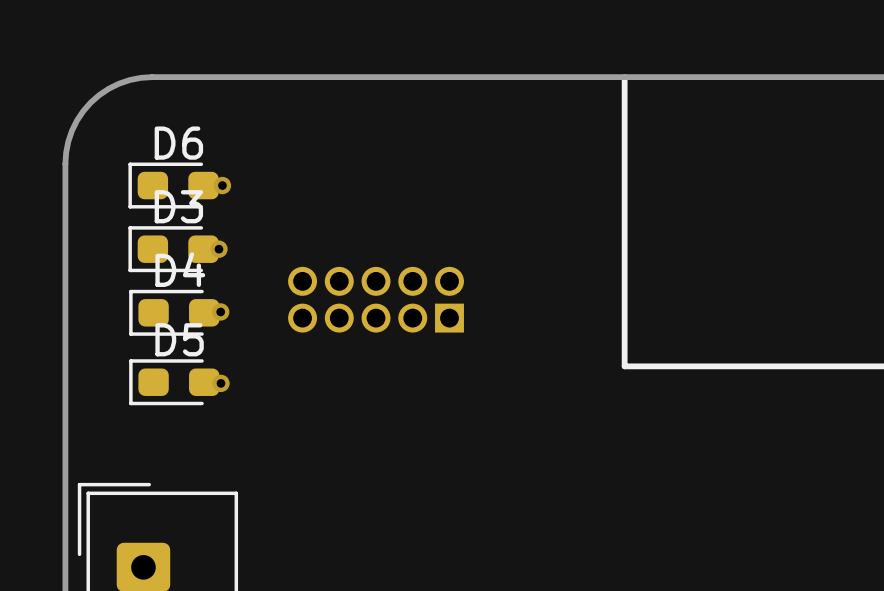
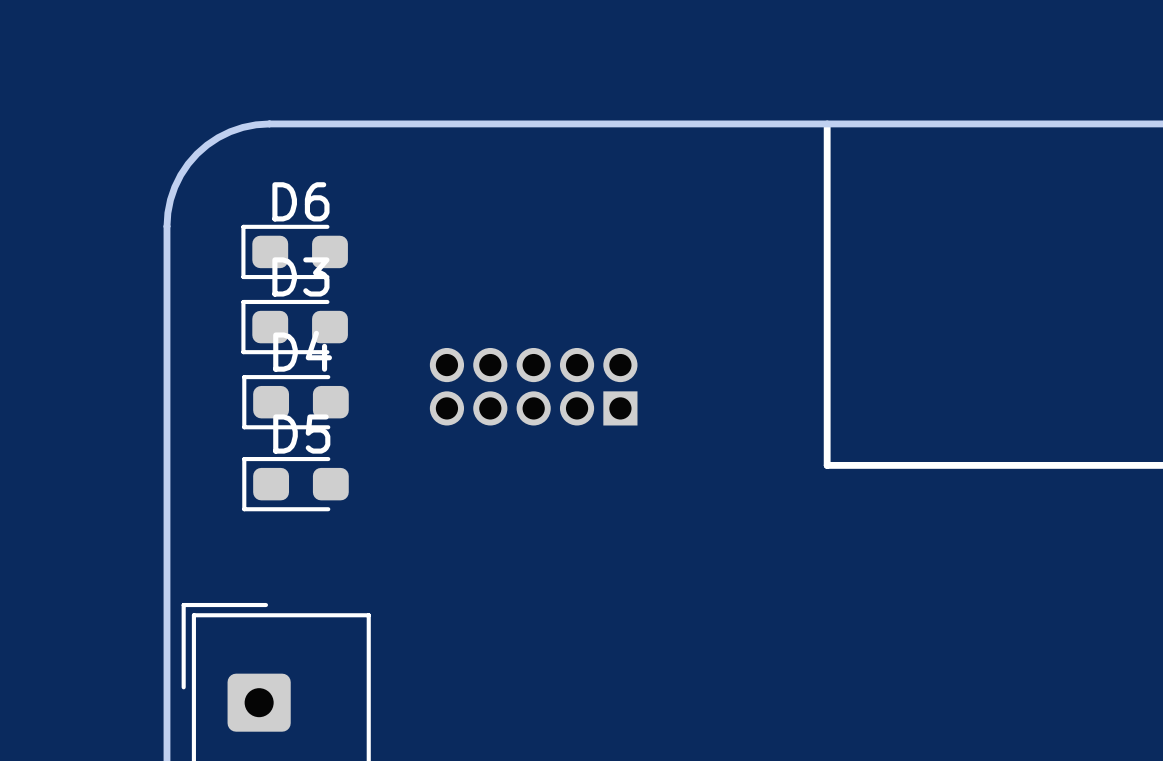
via: (222, 185) -> none
via: (218, 249) -> none
via: (220, 311) -> none
via: (220, 383) -> none

